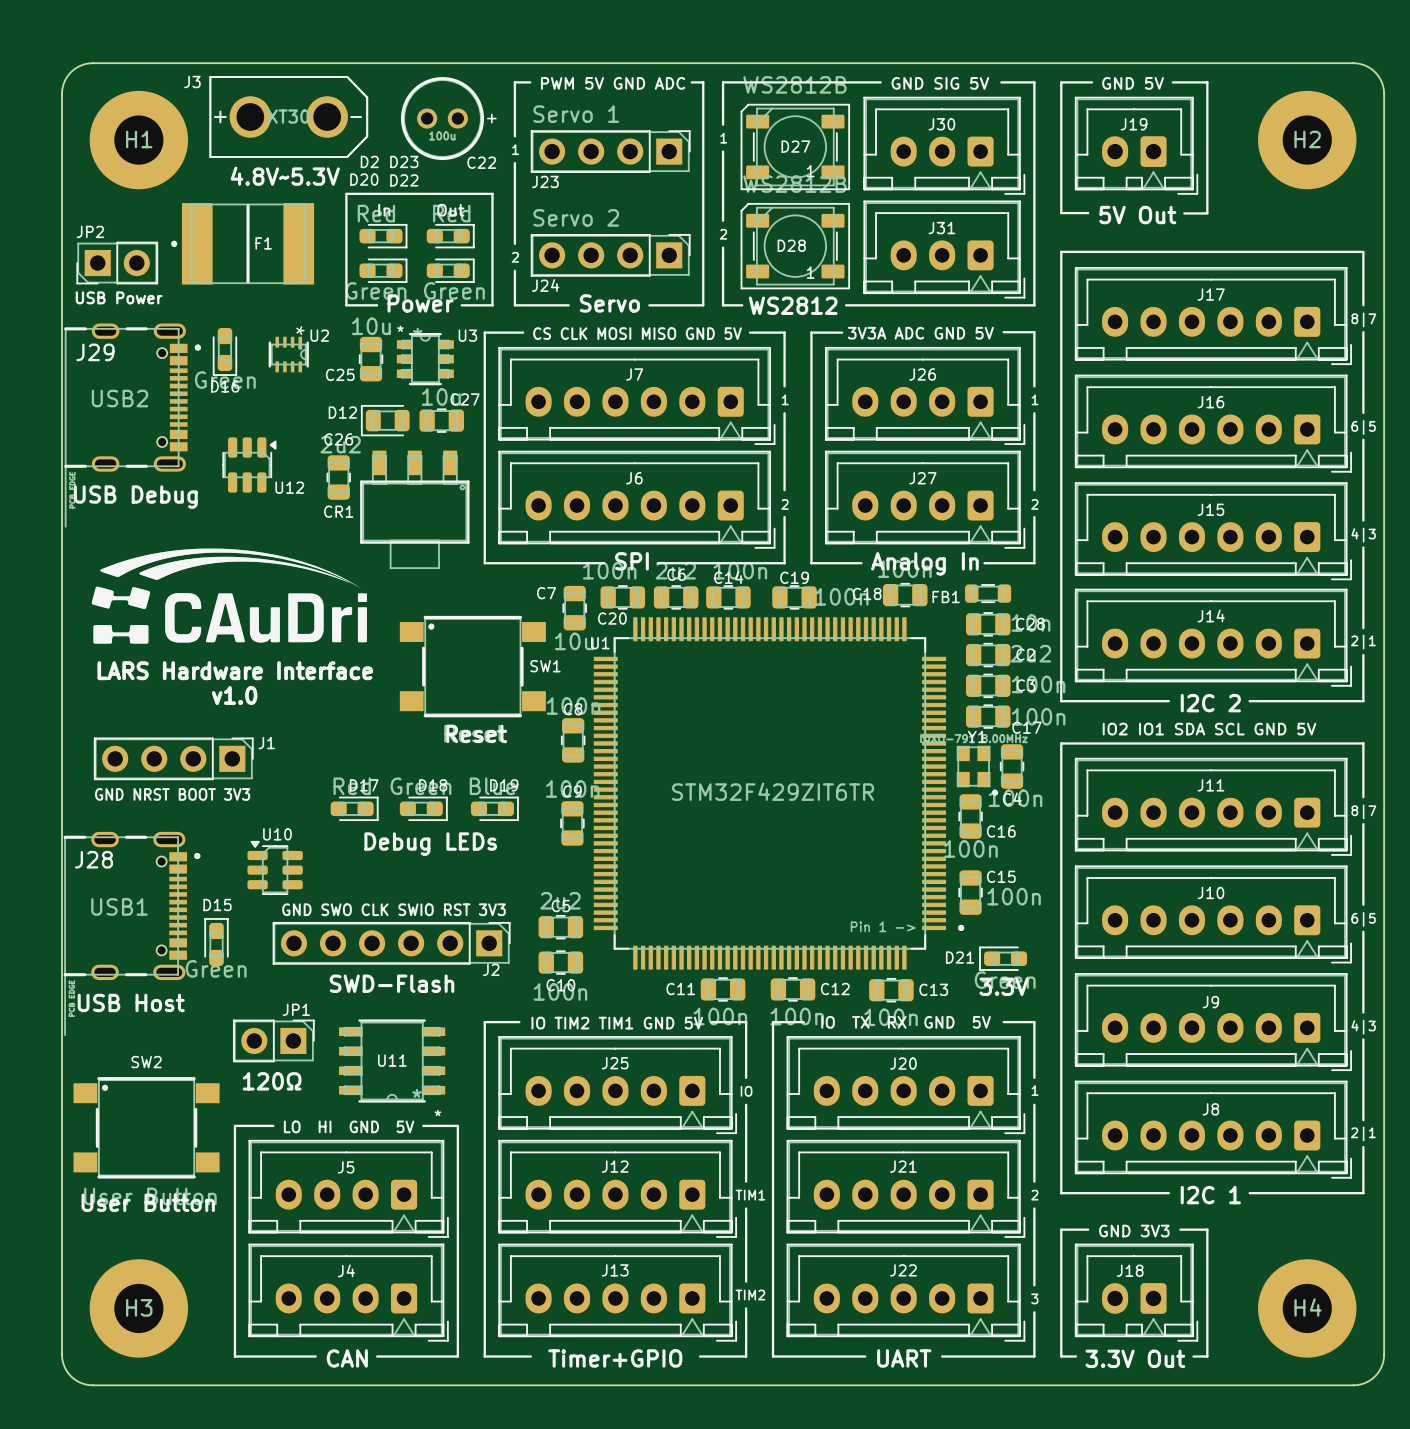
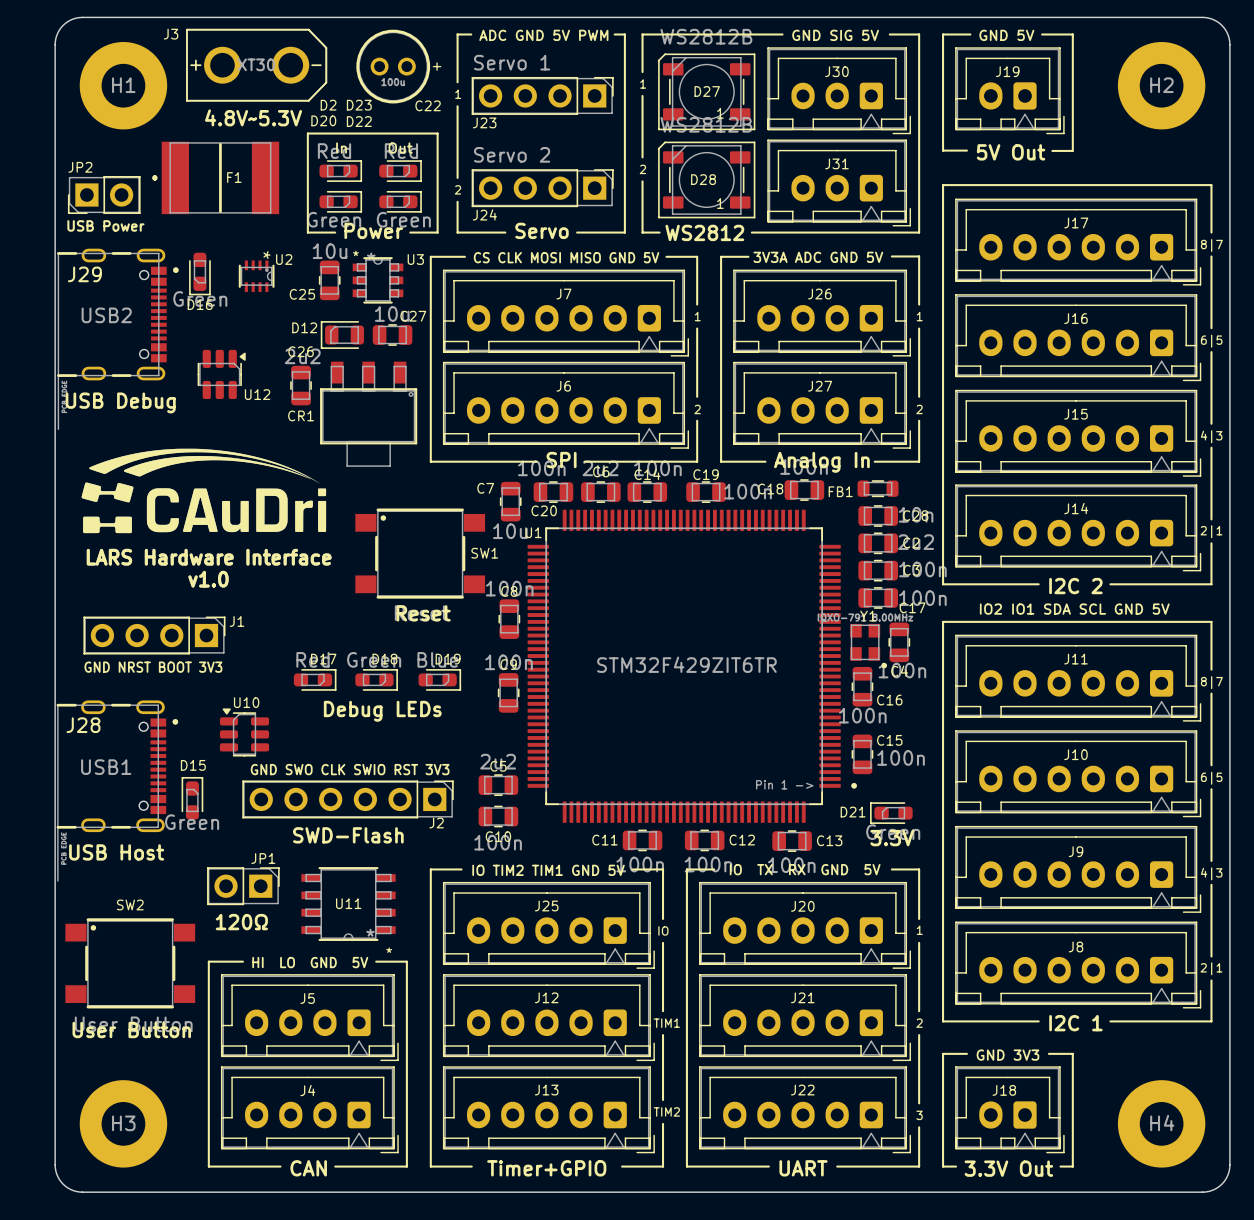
text: PWM 5V GND ADC (613, 83) -> ADC GND 5V PWM (543, 35)
text: LO HI GND 5V (349, 1126) -> HI LO GND 5V (310, 962)

